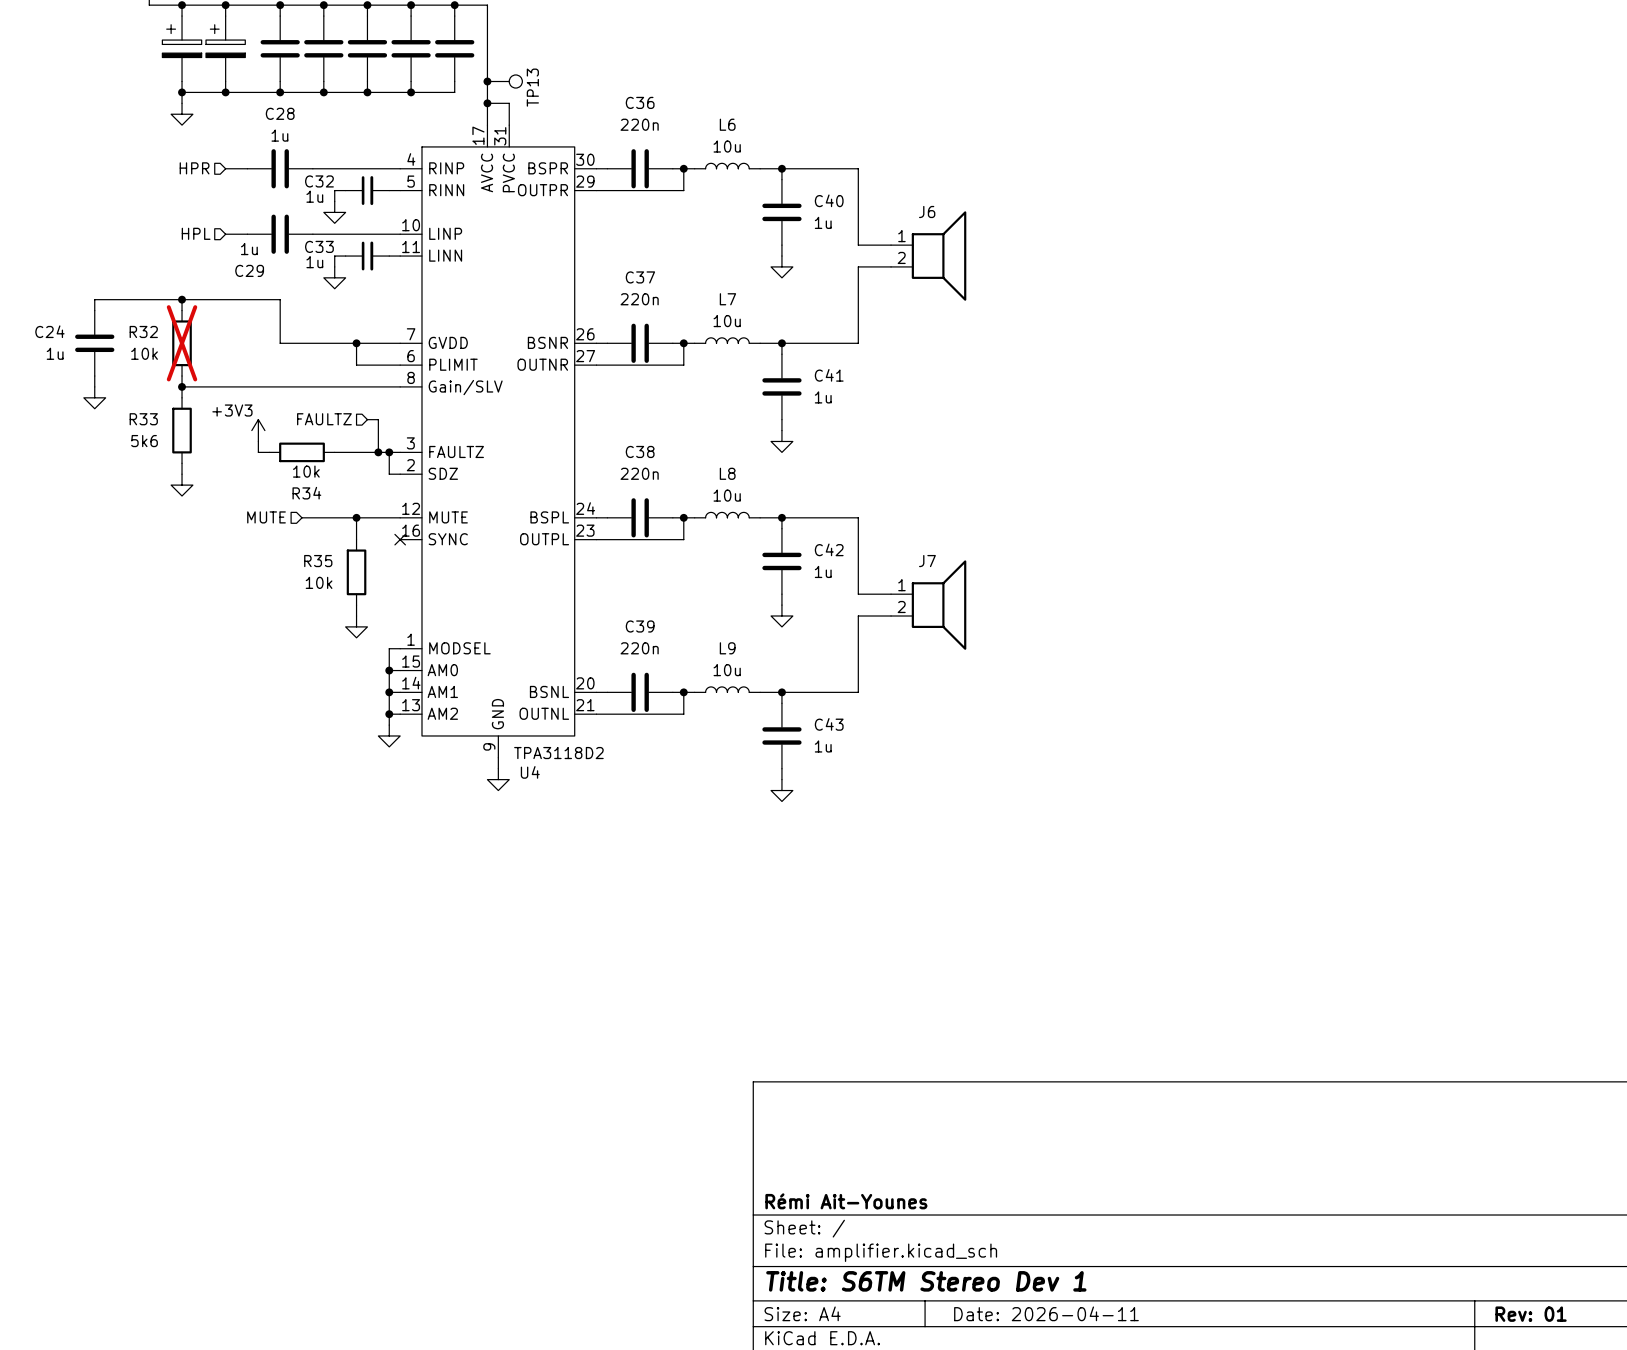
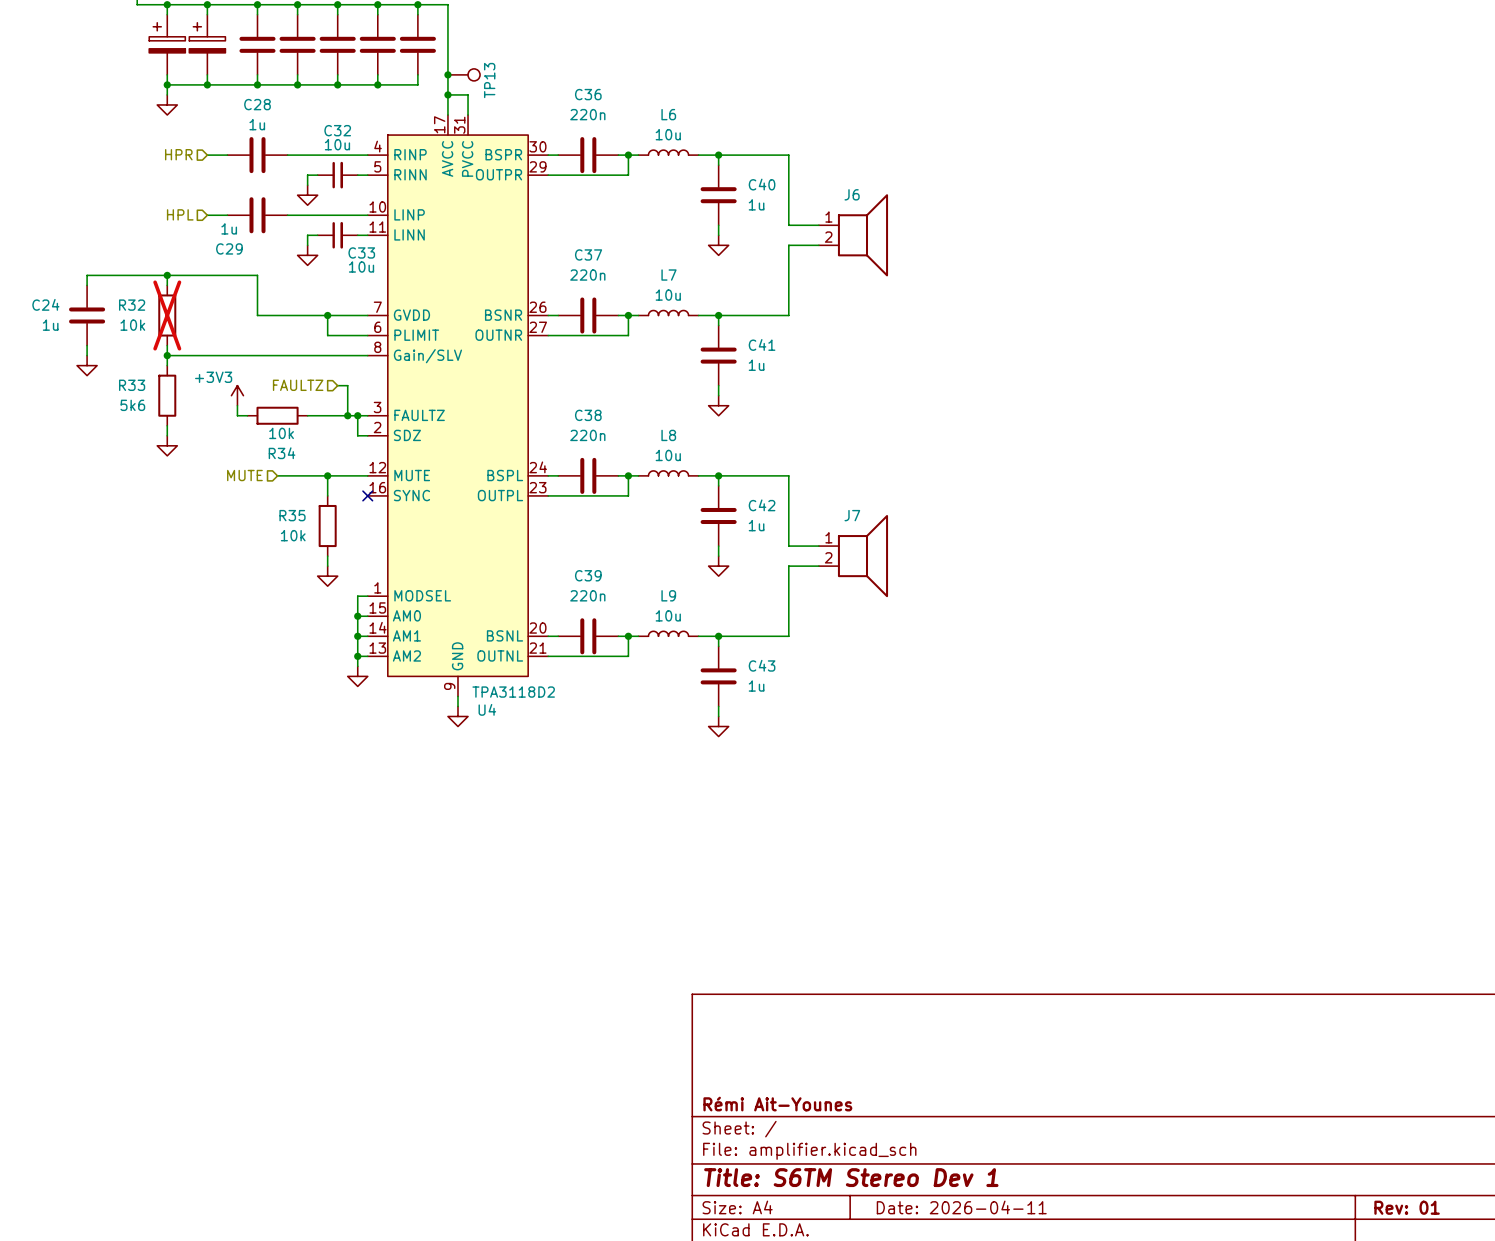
C32 name position: C32 (319, 181) -> C32 (337, 130)
C32 value: 1u (314, 196) -> 10u (337, 144)
C33 name position: C33 (319, 246) -> C33 (361, 252)
C33 value: 1u (314, 262) -> 10u (361, 267)

